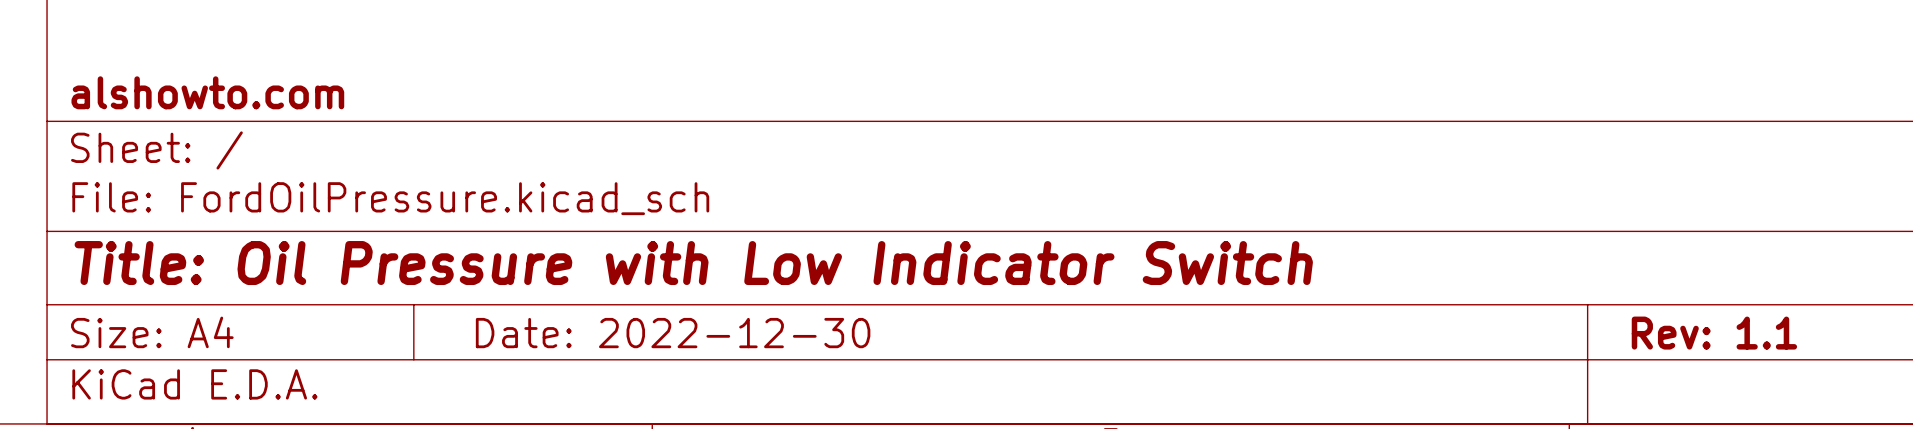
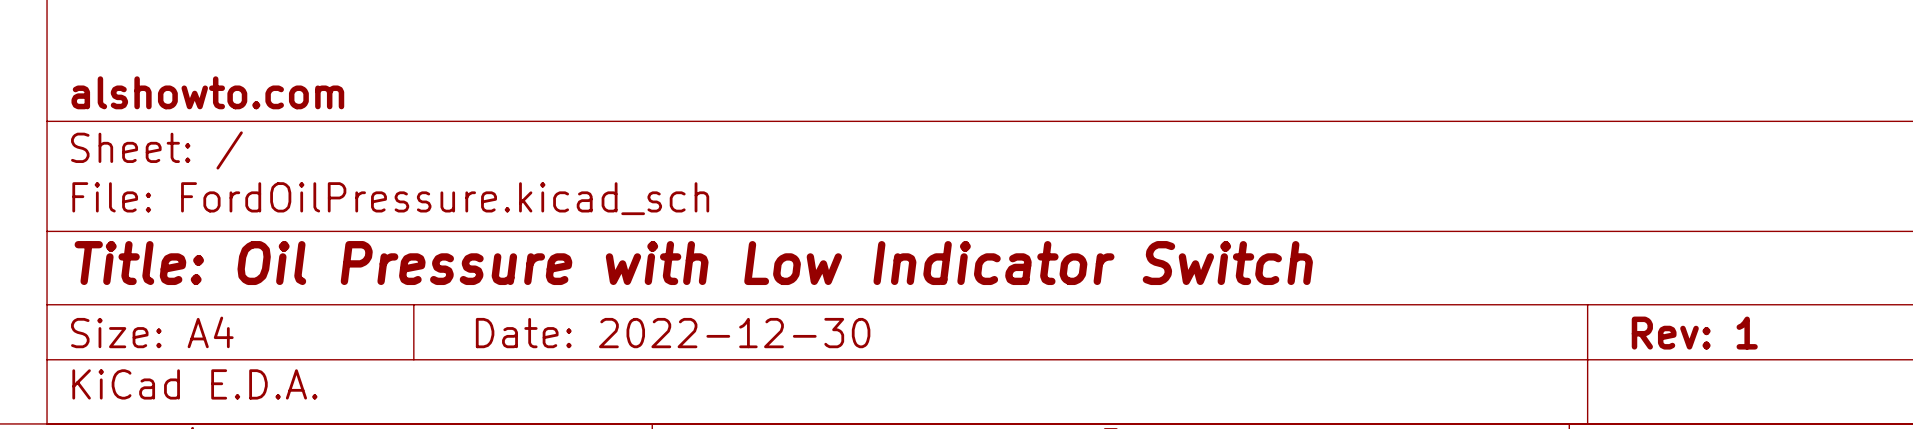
title block: Rev: 1.1 (1714, 333) -> Rev: 1 (1694, 333)

